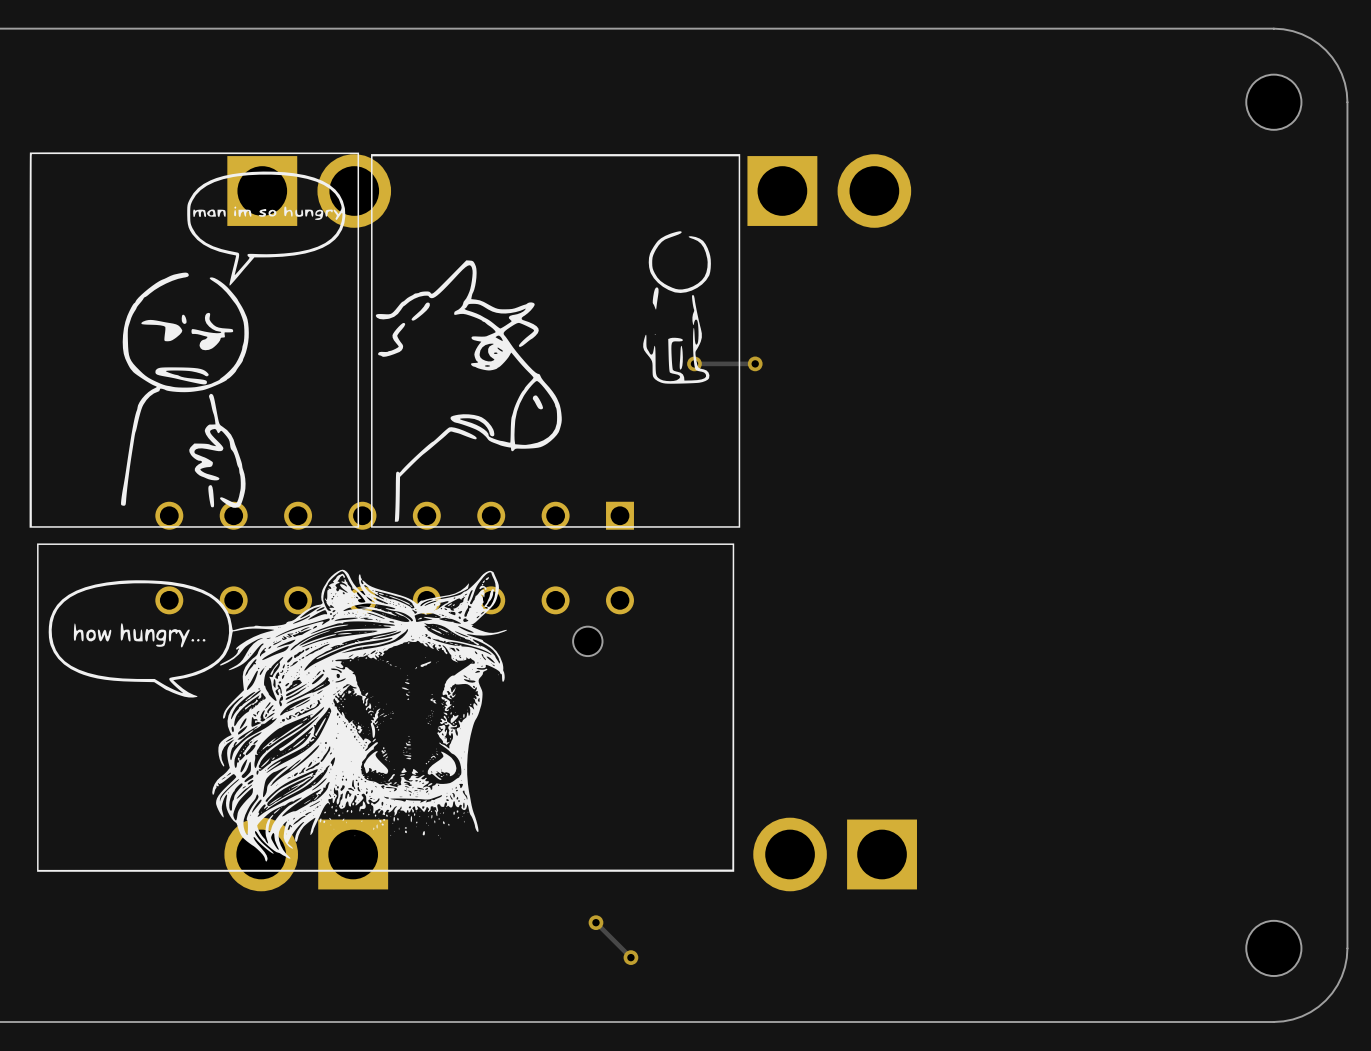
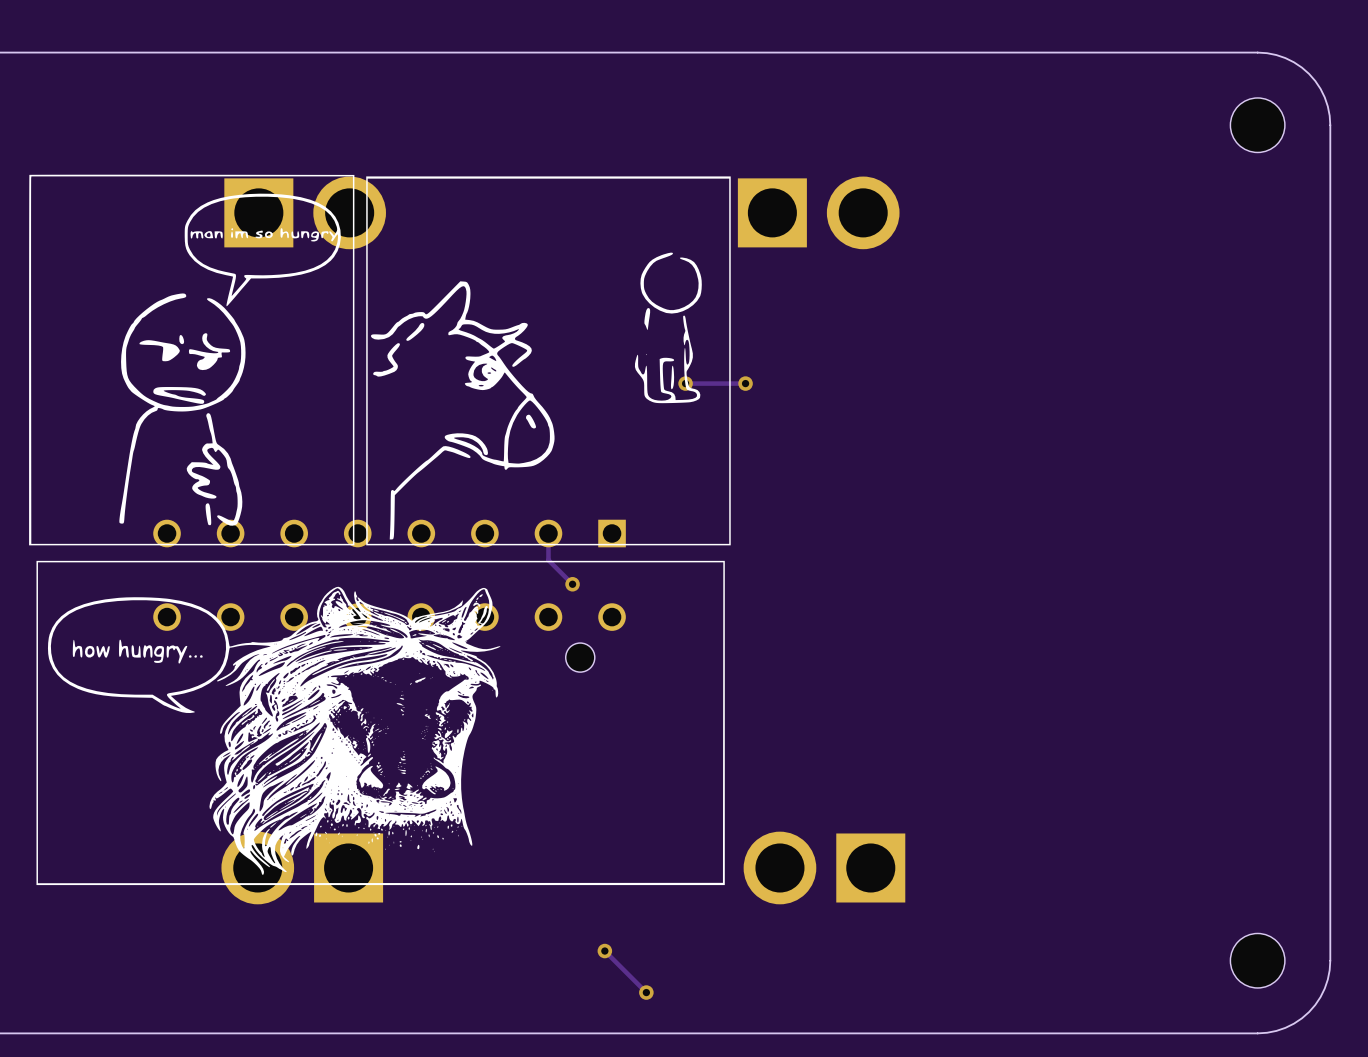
track: none -> (548, 533) (548, 560) (572, 584)
via: none -> (572, 584)
track: (595, 922) (630, 957) -> none
via: (595, 922) -> none
track: none -> (604, 951) (646, 992)
via: none -> (604, 951)
via: (630, 957) -> none
via: none -> (646, 992)

